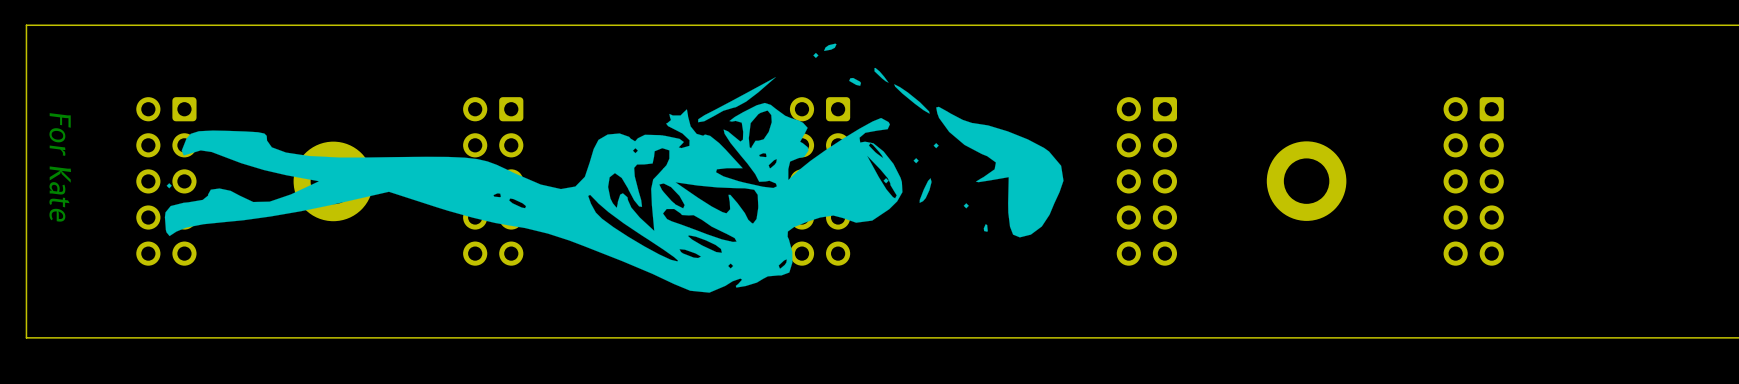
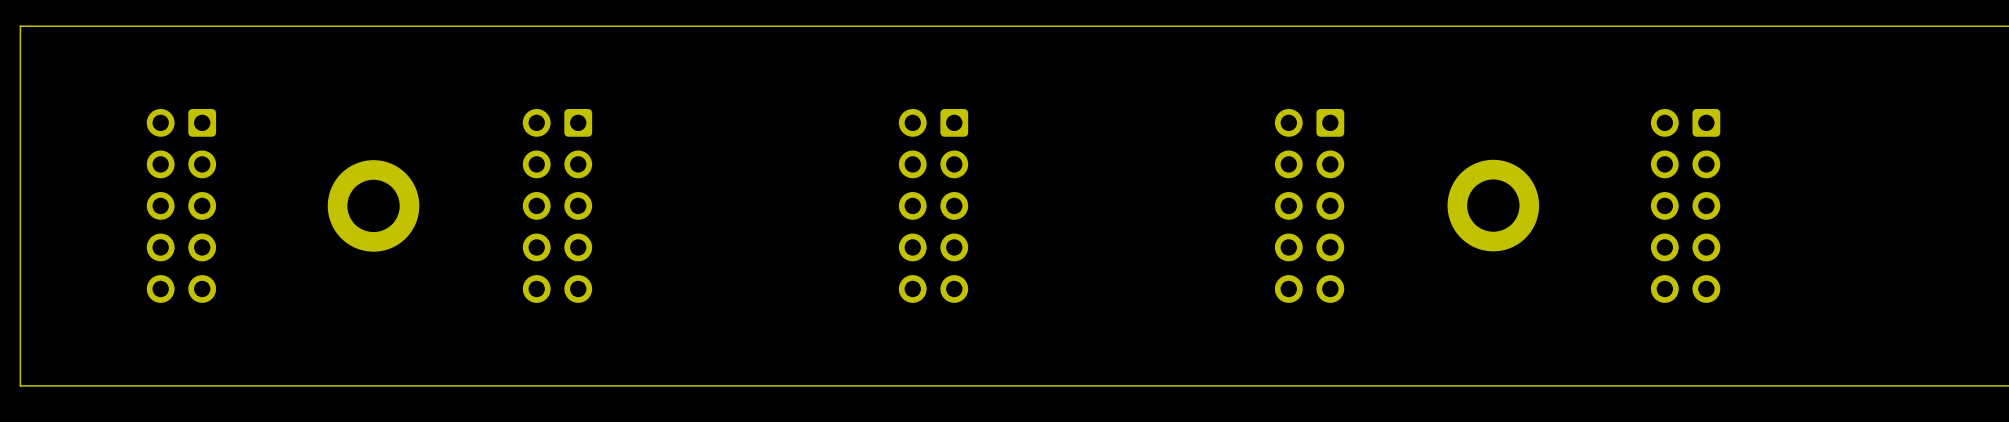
drawing: [164, 43, 1064, 293] -> none
text: For Kate (60, 167) -> none

